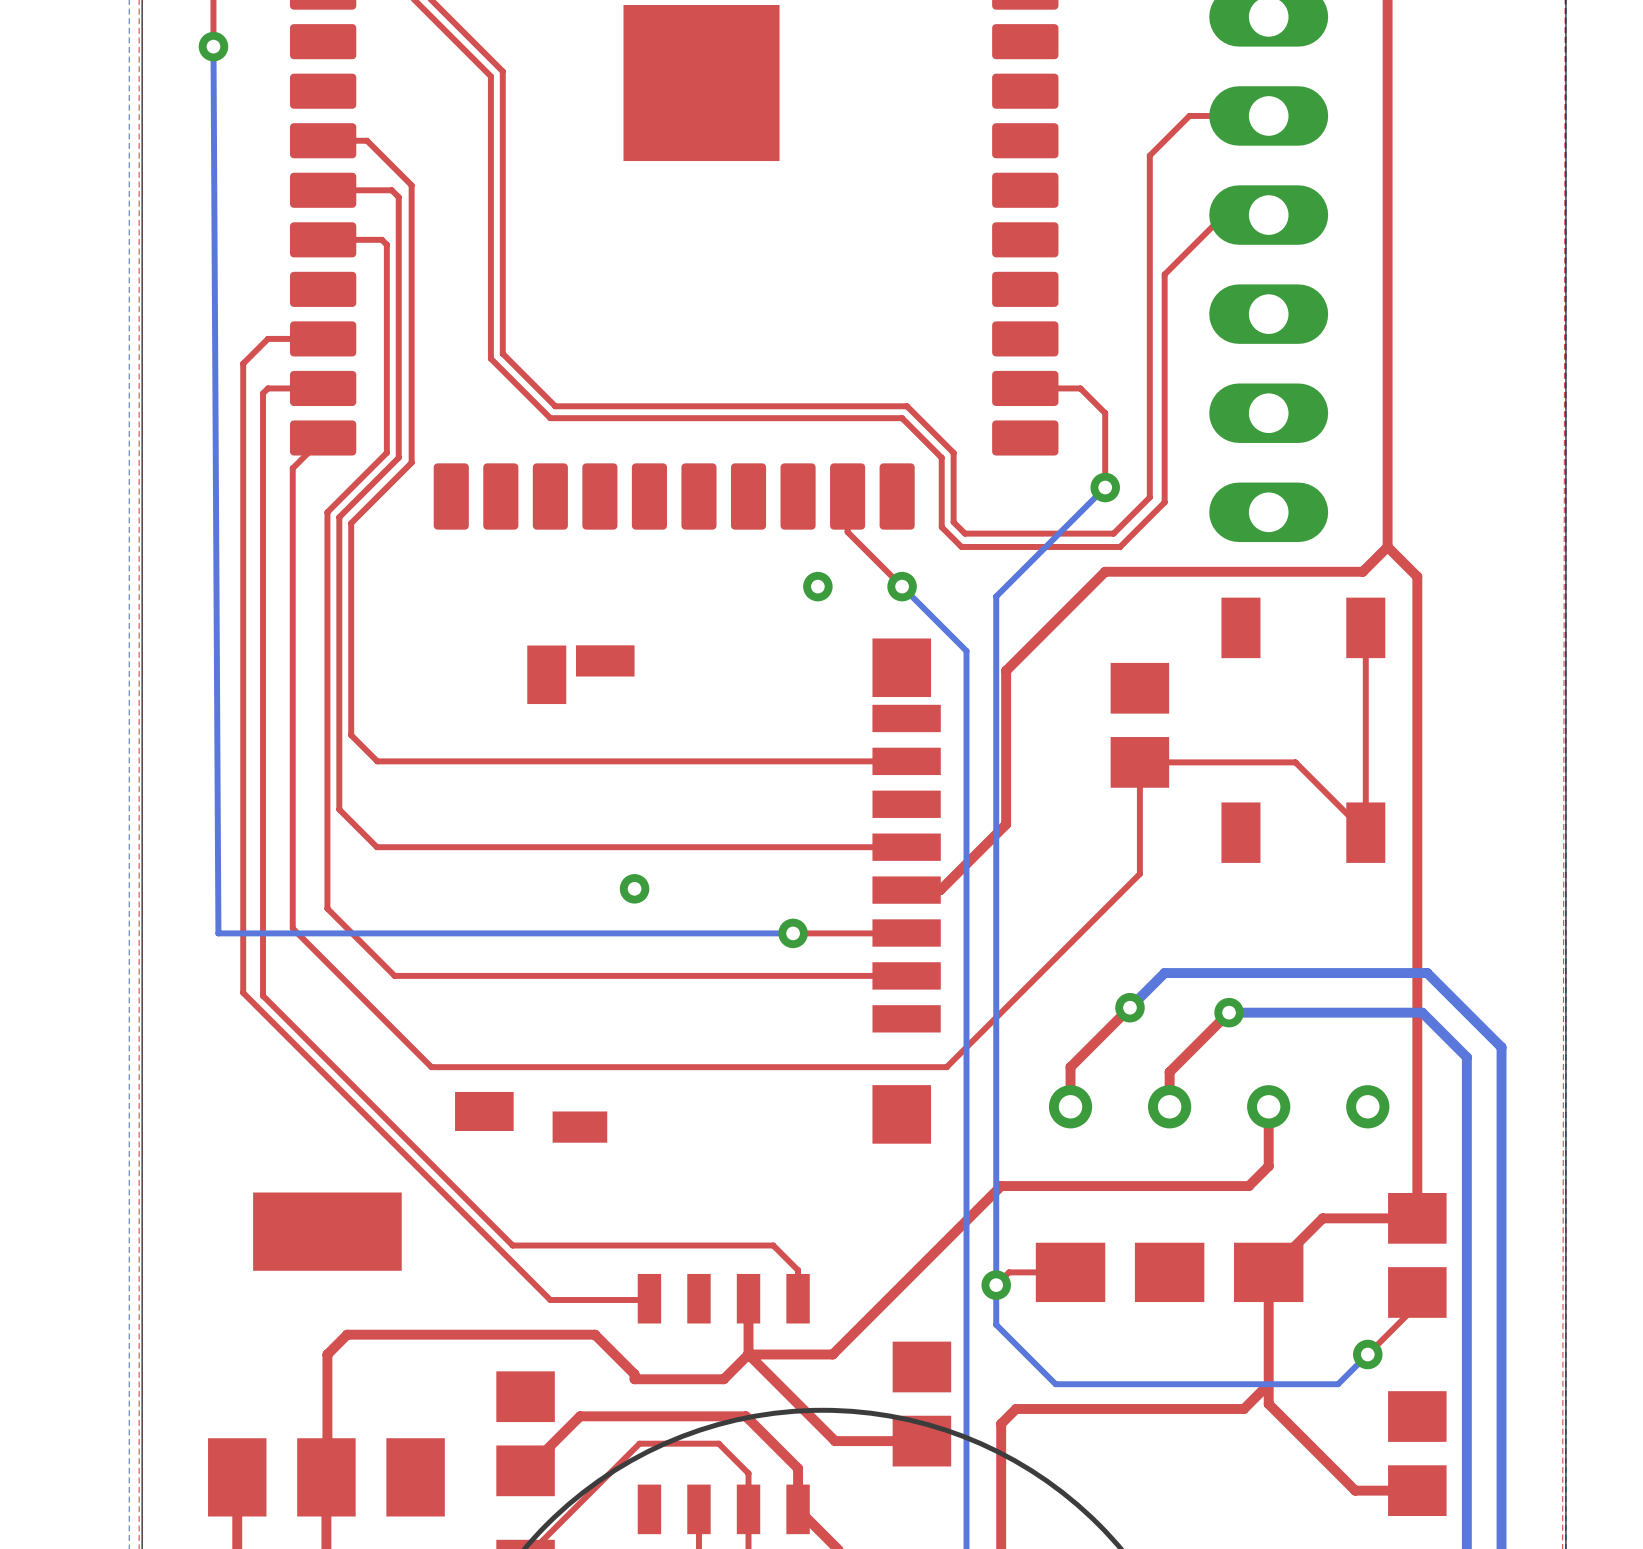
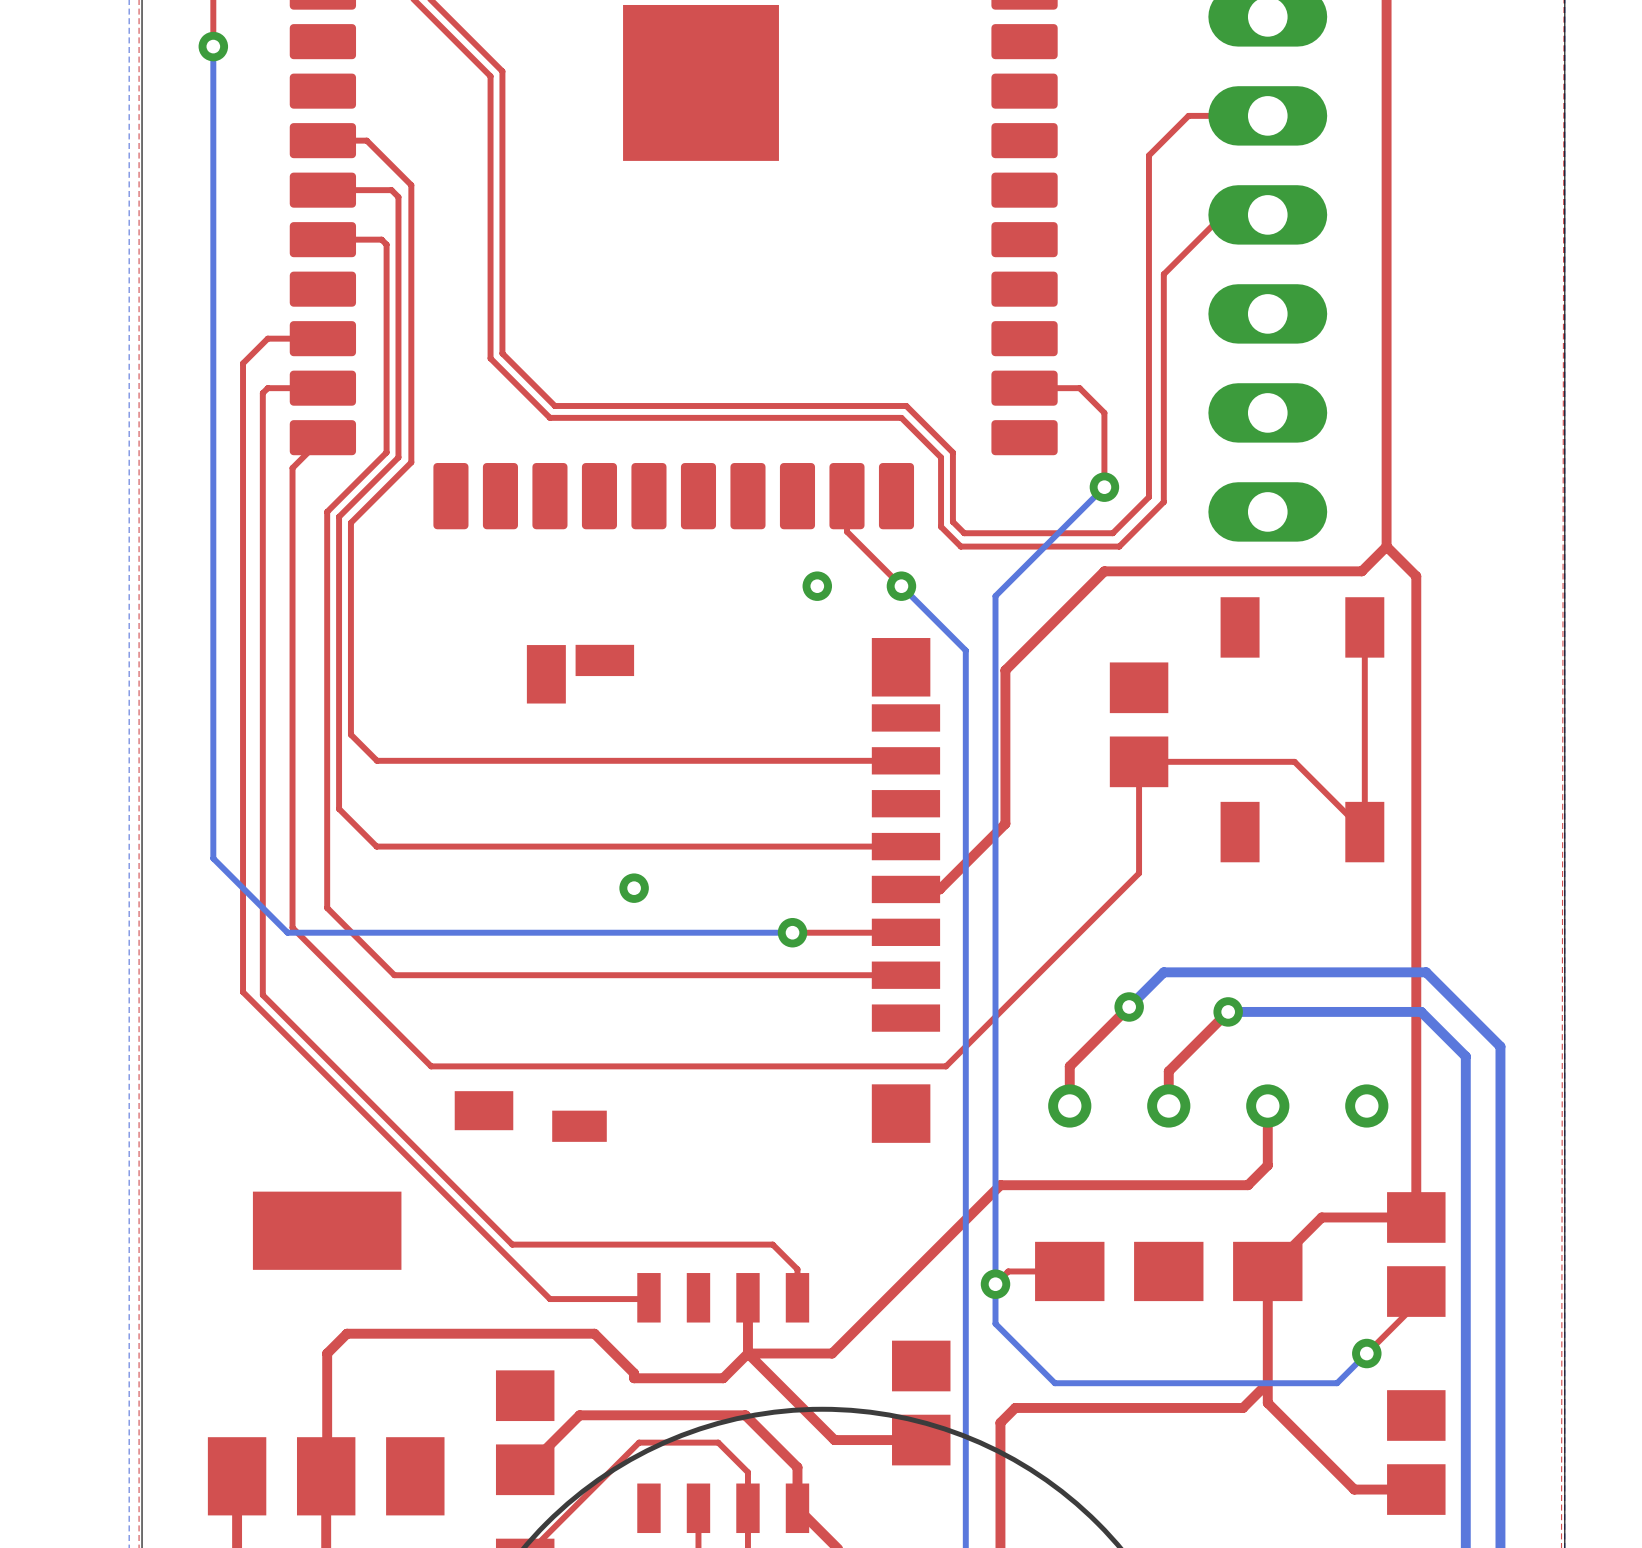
bottom track: (213, 46) (218, 933) (287, 933) -> (208, 51) (213, 46) (213, 858) (287, 932)

